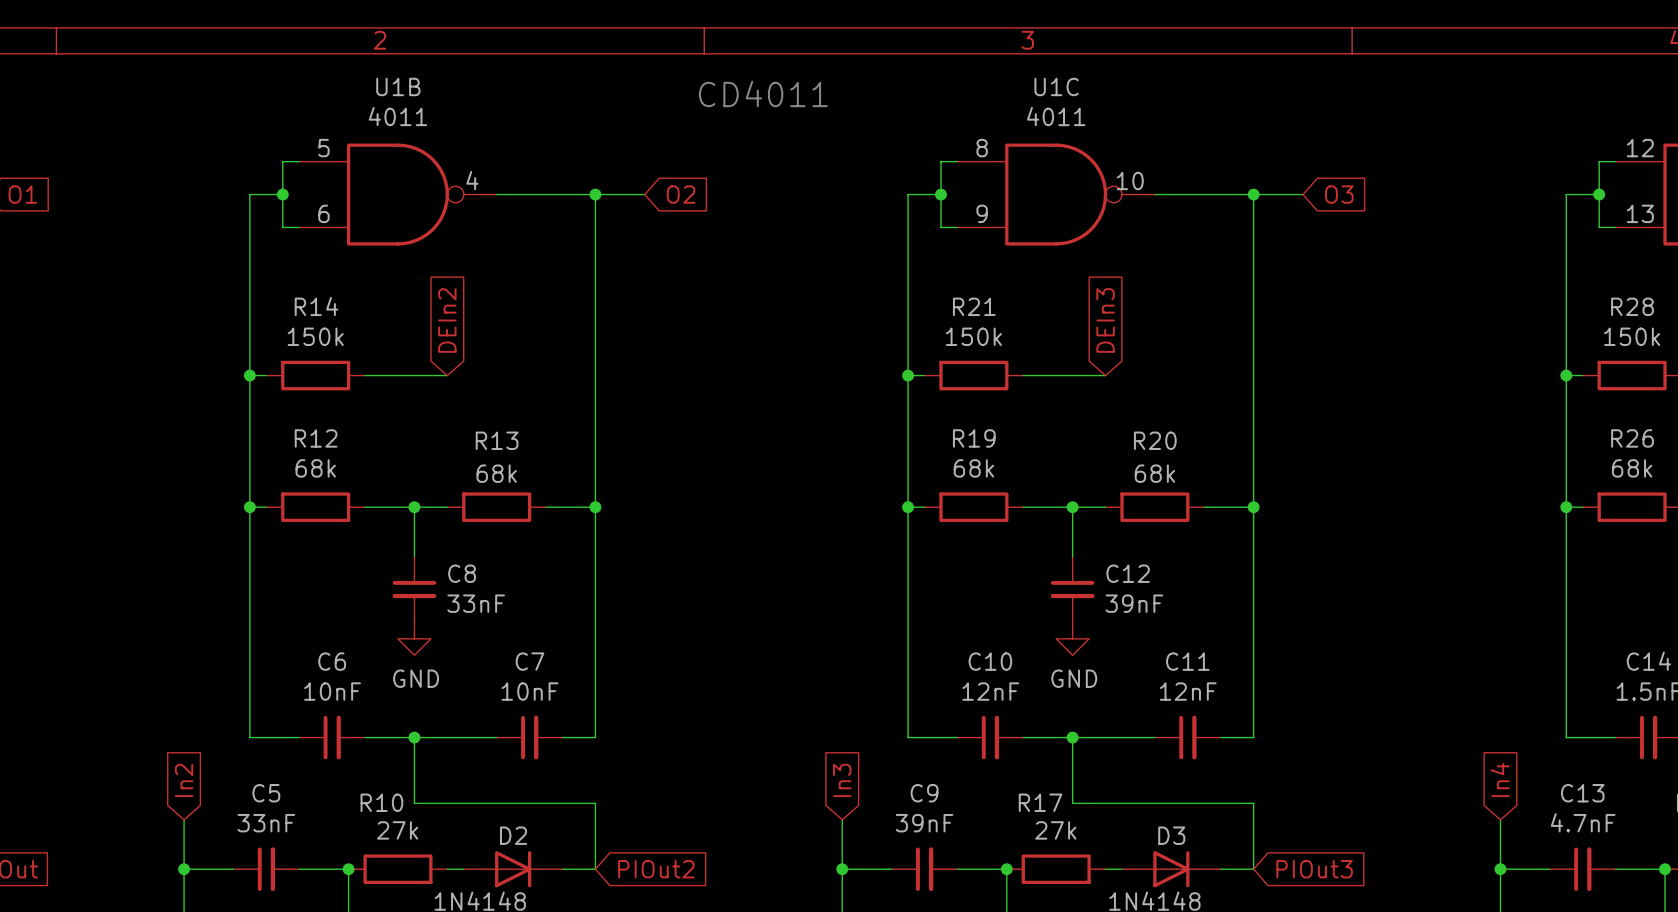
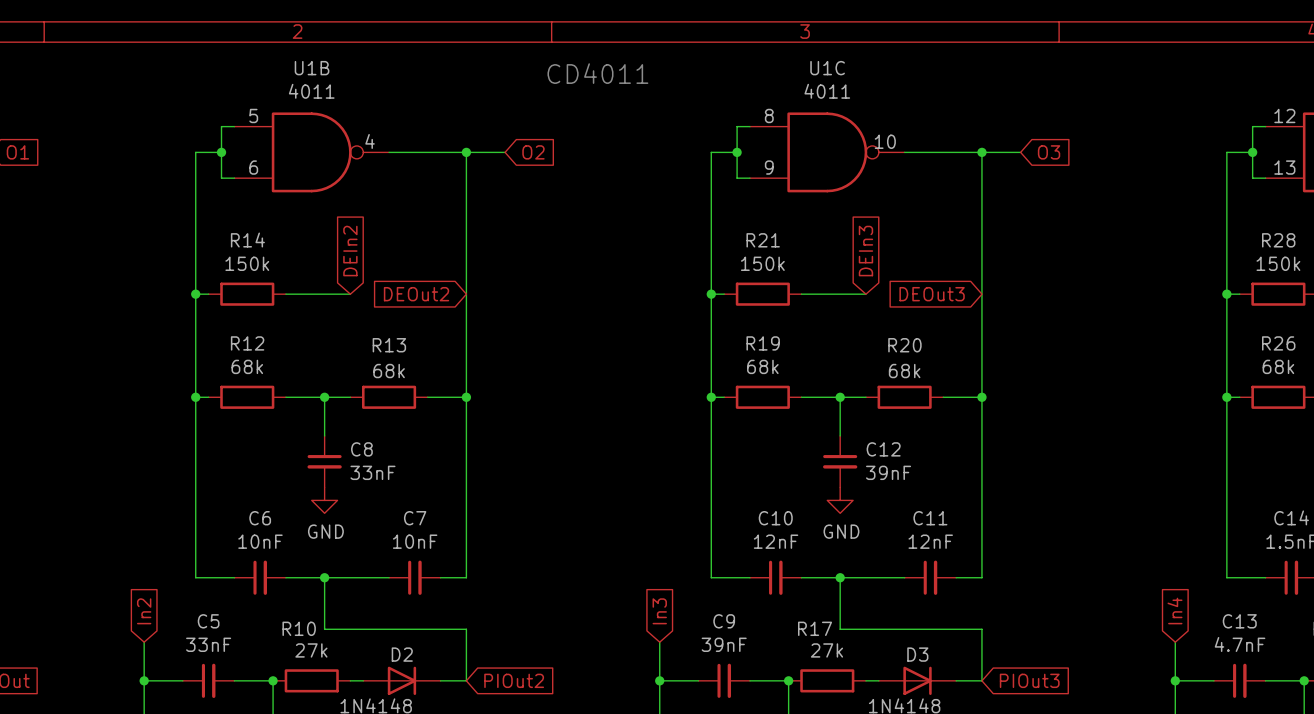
global label: none -> DEOut2 (416, 294)
global label: none -> DEOut3 (932, 294)

